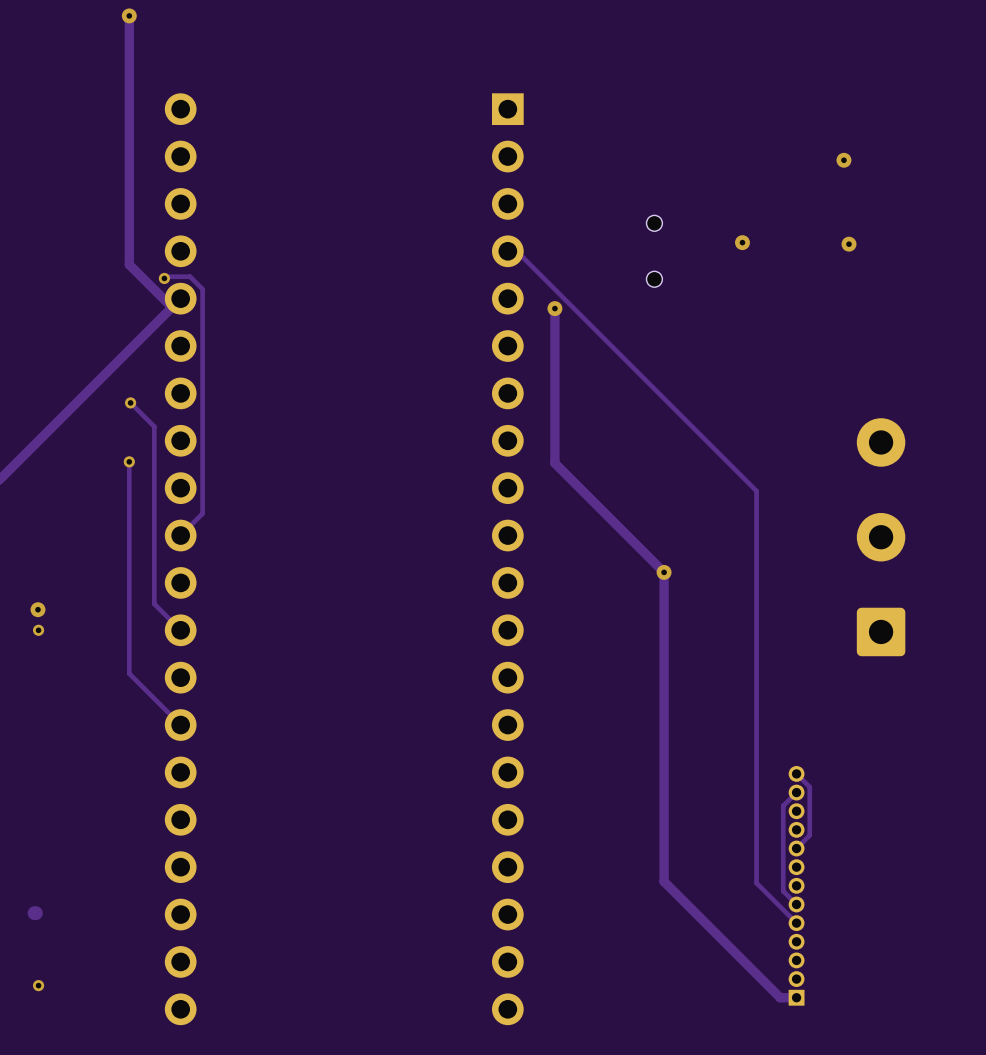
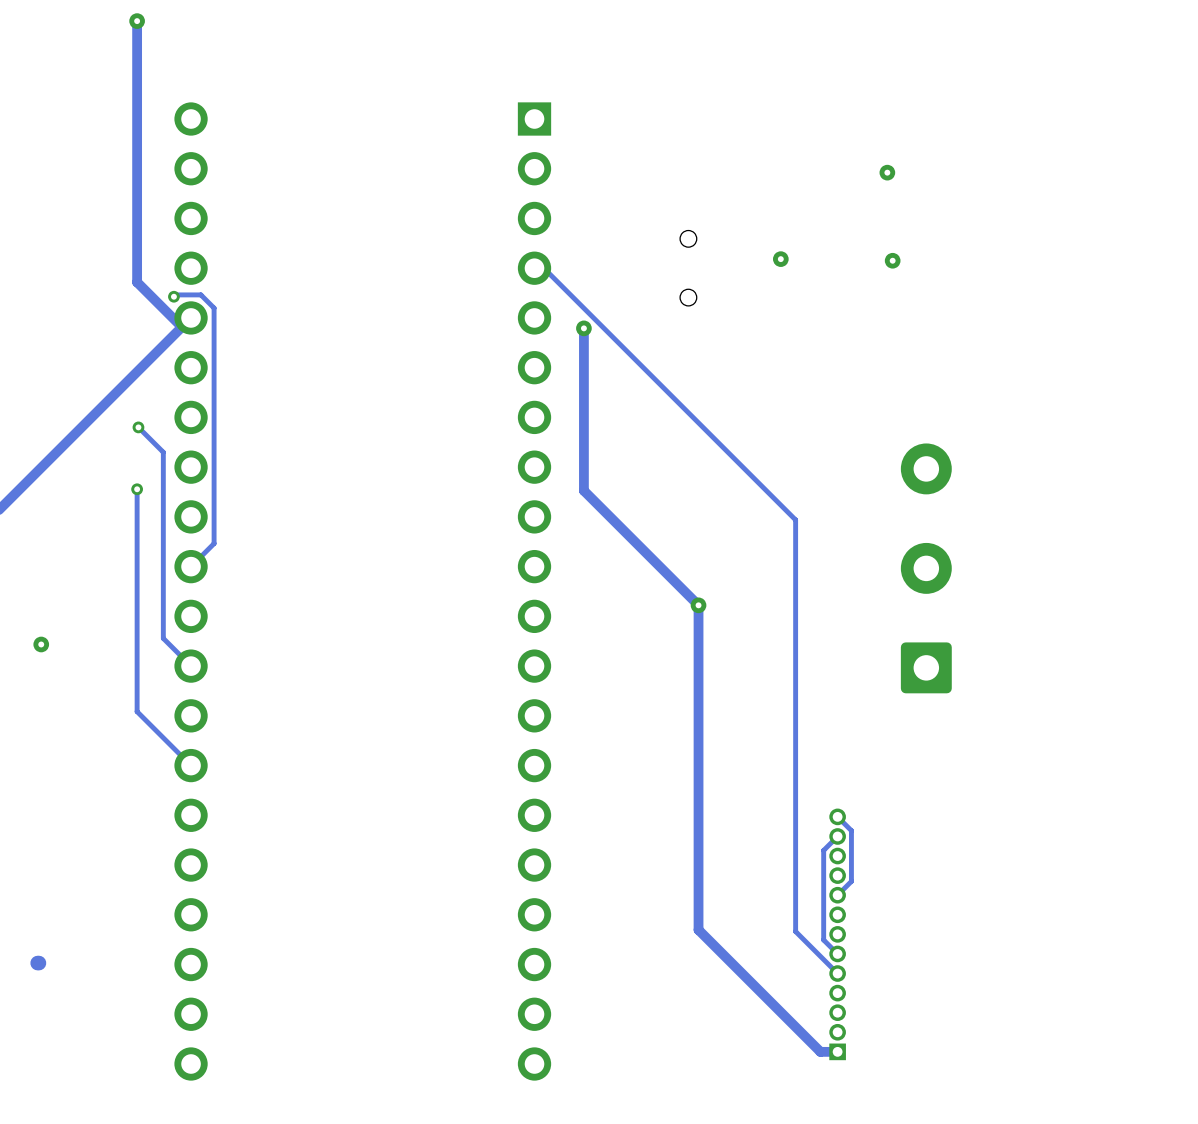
via: (38, 630) -> none
via: (38, 985) -> none

